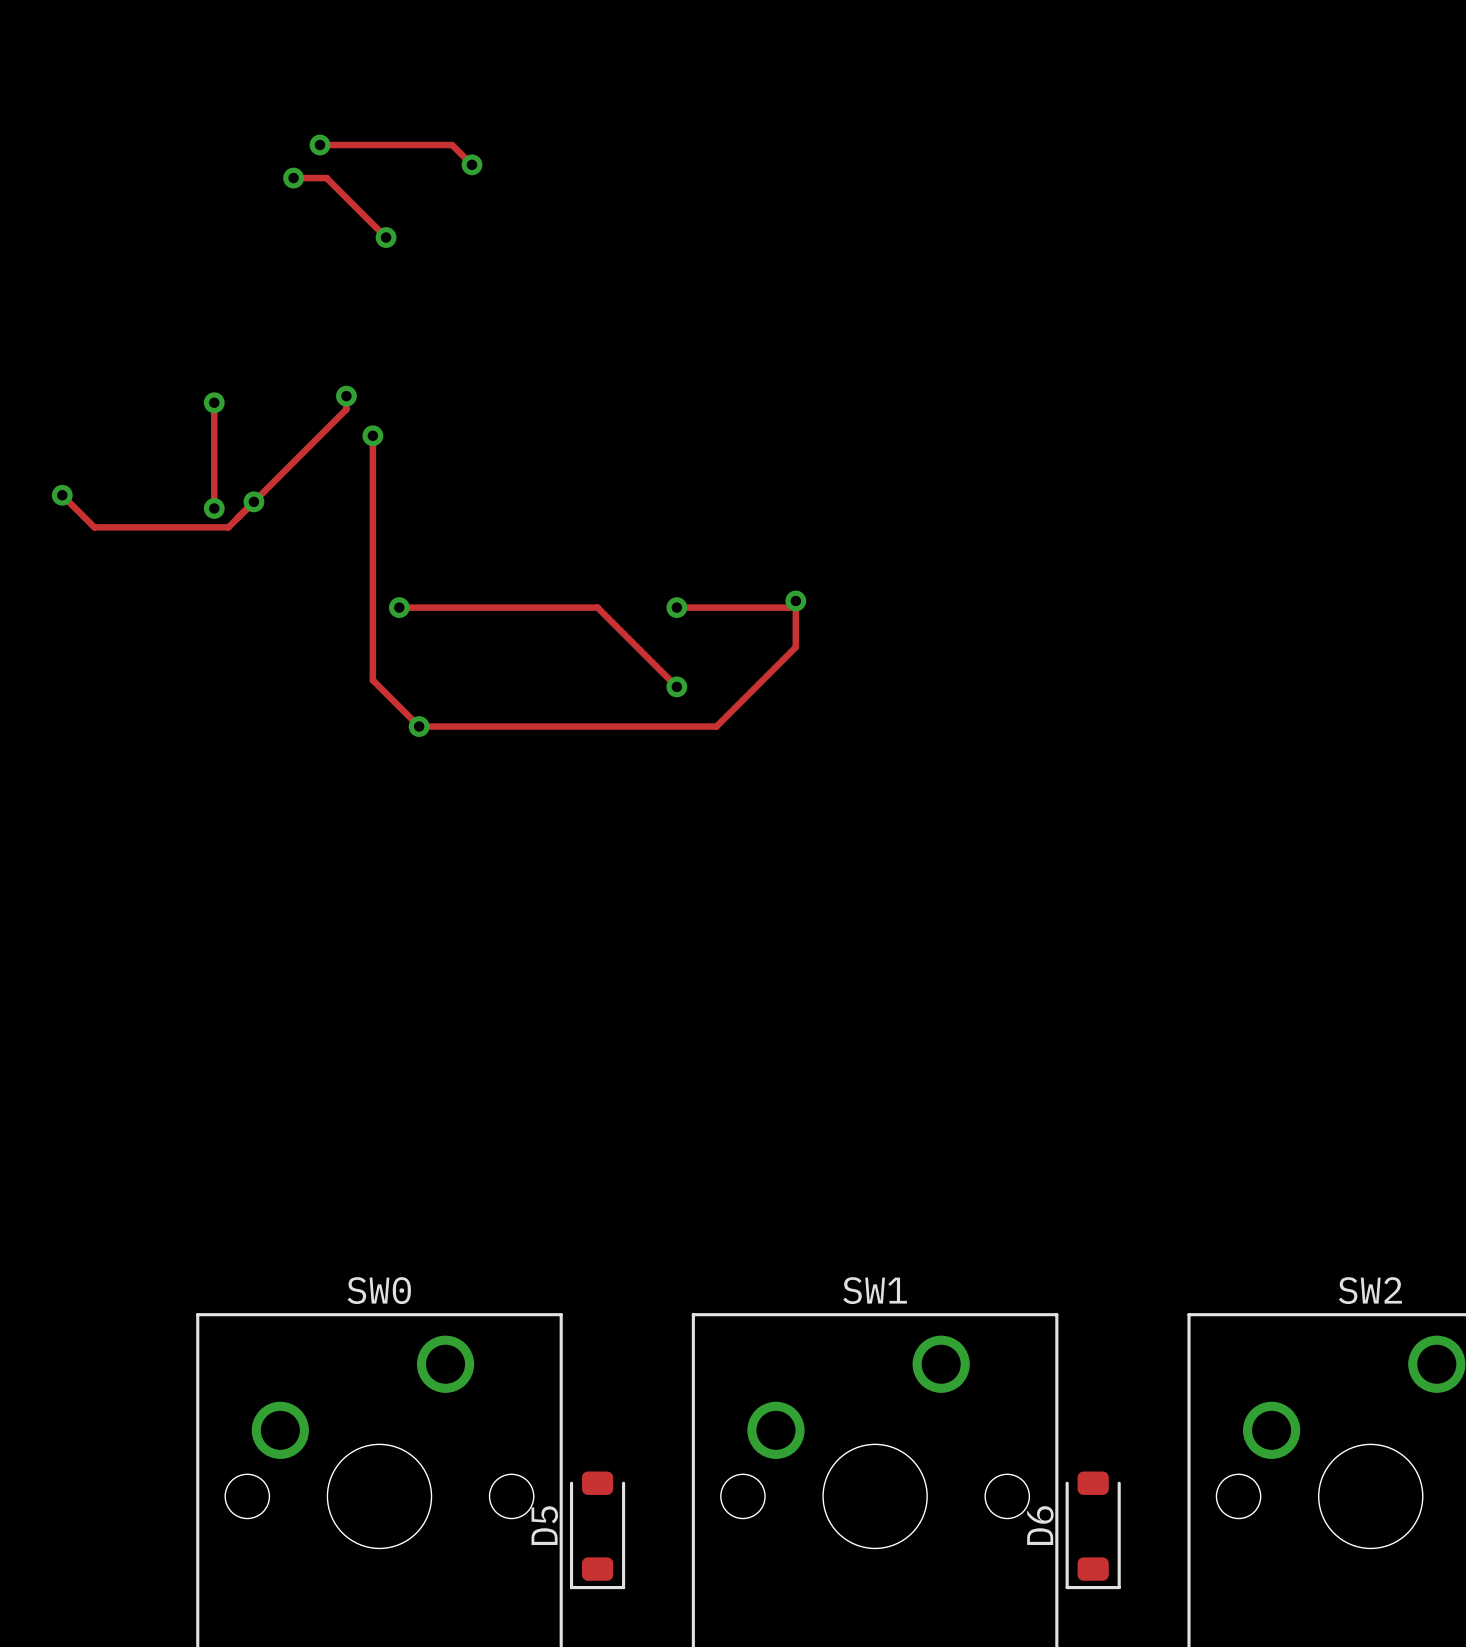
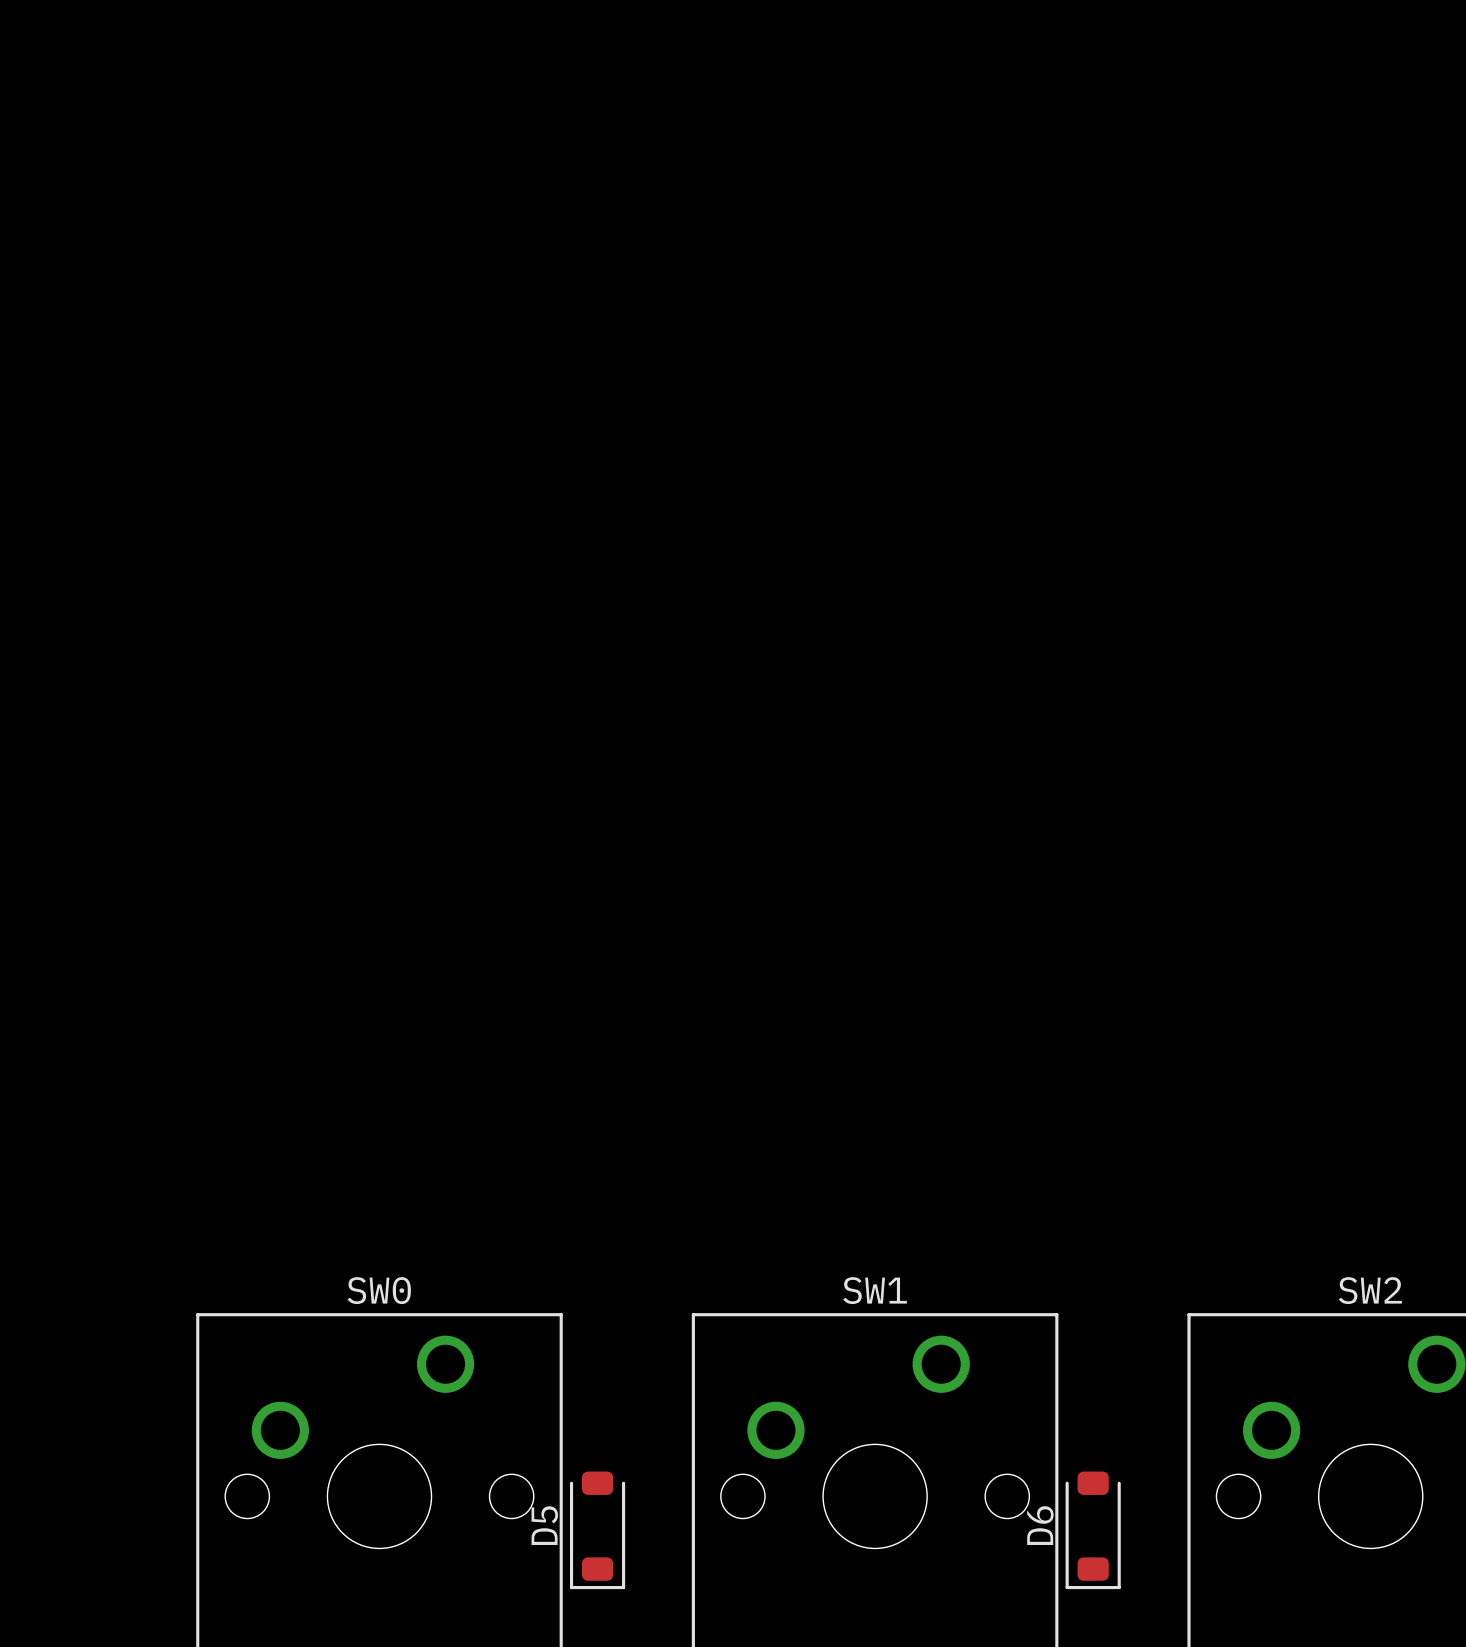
track: (320, 145) (452, 145) (472, 164) -> none
via: (320, 145) -> none
via: (472, 164) -> none
track: (293, 178) (326, 178) (386, 237) -> none
via: (293, 178) -> none
via: (386, 237) -> none
track: (346, 396) (346, 409) (228, 527) (94, 527) (62, 495) -> none
via: (346, 396) -> none
track: (214, 402) (214, 508) -> none
via: (214, 402) -> none
track: (372, 435) (372, 680) (419, 726) (716, 726) (795, 647) (795, 600) (789, 607) (676, 607) -> none
via: (372, 435) -> none
via: (62, 495) -> none
via: (253, 501) -> none
via: (214, 508) -> none
via: (795, 600) -> none
track: (399, 607) (597, 607) (676, 686) -> none
via: (399, 607) -> none
via: (676, 607) -> none
via: (676, 686) -> none
via: (419, 726) -> none

